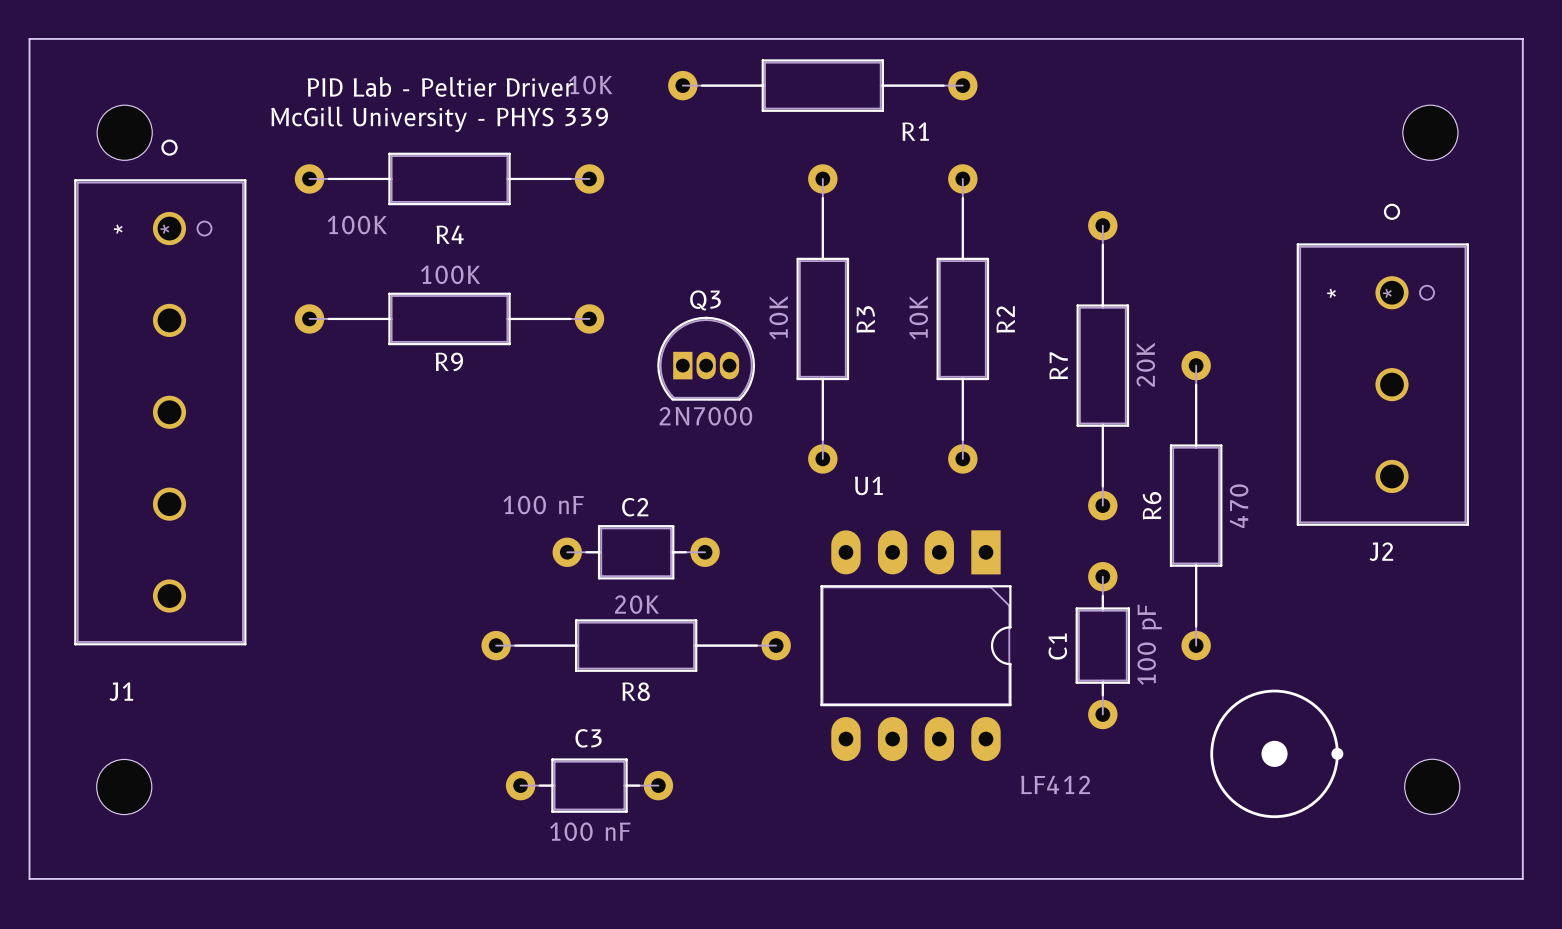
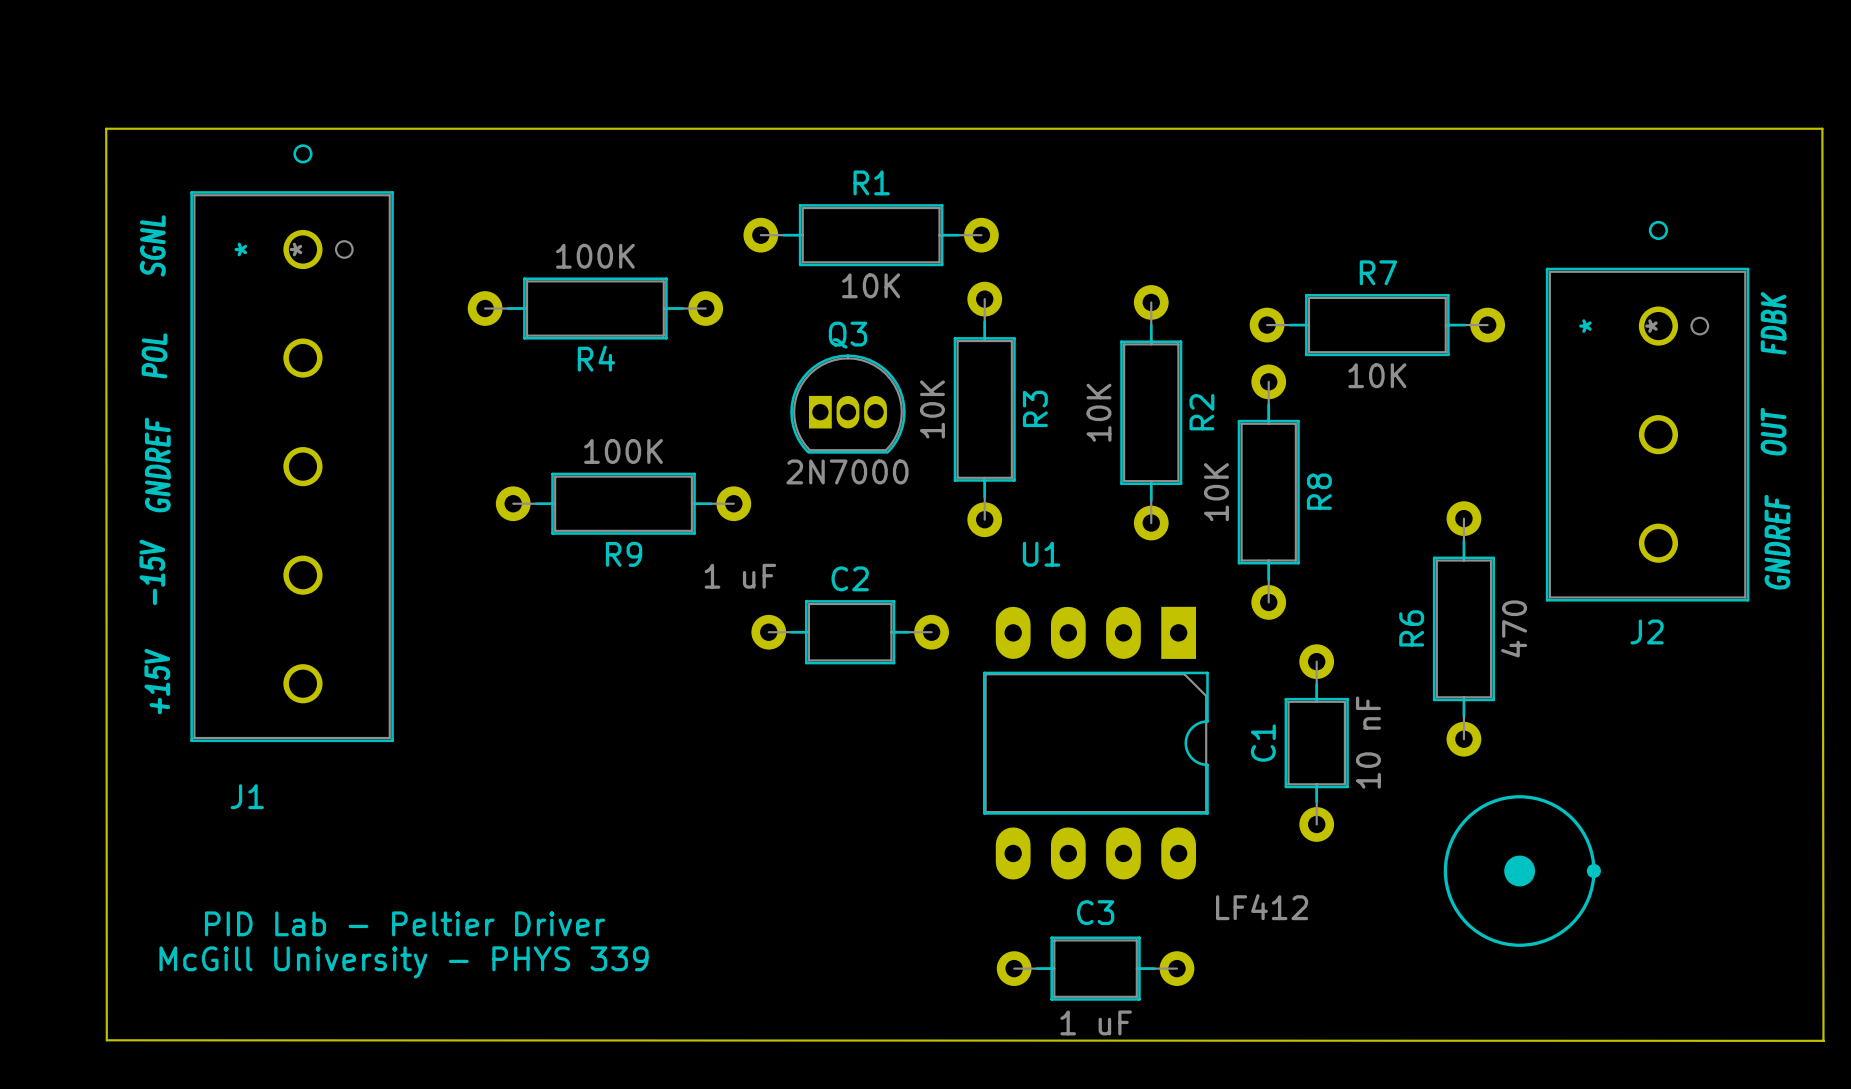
board edge: (29, 38) (1522, 38) (1522, 878) (29, 878) (29, 38) -> none
R1 footprint: [668, 59, 978, 112] -> [743, 204, 999, 267]
R1 value position: 10K (590, 85) -> 10K (871, 285)
text: PID Lab - Peltier Driver (440, 86) -> none
text: McGill University - PHYS 339 (439, 119) -> none
R1 name position: R1 (915, 131) -> R1 (871, 182)
part: (124, 132) -> none
part: (1430, 132) -> none
R4 footprint: [294, 152, 605, 206] -> [467, 277, 724, 340]
R3 footprint: [796, 164, 850, 474] -> [953, 281, 1016, 538]
R2 footprint: [936, 164, 990, 474] -> [1120, 285, 1183, 541]
R7 footprint: [1076, 210, 1130, 521] -> [1249, 294, 1506, 357]
text: none -> SGNL (152, 245)
R4 value position: 100K (357, 225) -> 100K (595, 256)
text: none -> FDBK (1773, 323)
R9 footprint: [294, 292, 605, 346] -> [495, 472, 752, 535]
text: none -> POL (154, 355)
R6 footprint: [1169, 350, 1223, 661] -> [1432, 501, 1495, 757]
R7 value: 20K (1145, 364) -> 10K (1377, 375)
R7 name position: R7 (1058, 365) -> R7 (1378, 272)
text: none -> OUT (1773, 431)
J1 position: (160, 392) -> (292, 443)
text: none -> GNDREF (157, 465)
text: none -> GNDREF (1777, 542)
text: none -> -15V (152, 572)
C2 value: 100 nF (543, 505) -> 1 uF (740, 576)
C2 position: (636, 552) -> (850, 632)
text: none -> +15V (157, 681)
R8 value: 20K (637, 604) -> 10K (1216, 492)
R8 footprint: [481, 619, 791, 672] -> [1237, 364, 1300, 620]
C1 value: 100 pF (1149, 644) -> 10 nF (1368, 742)
R8 name position: R8 (636, 691) -> R8 (1319, 491)
C3 position: (589, 785) -> (1095, 968)
part: (1432, 786) -> none
part: (124, 787) -> none
text: none -> PID Lab - Peltier Driver (405, 923)
text: none -> McGill University - PHYS 339 (404, 962)
C3 value: 100 nF (590, 831) -> 1 uF (1096, 1022)
board edge: none -> (1823, 1040) (1822, 128) (106, 128) (106, 1040) (1824, 1040)

